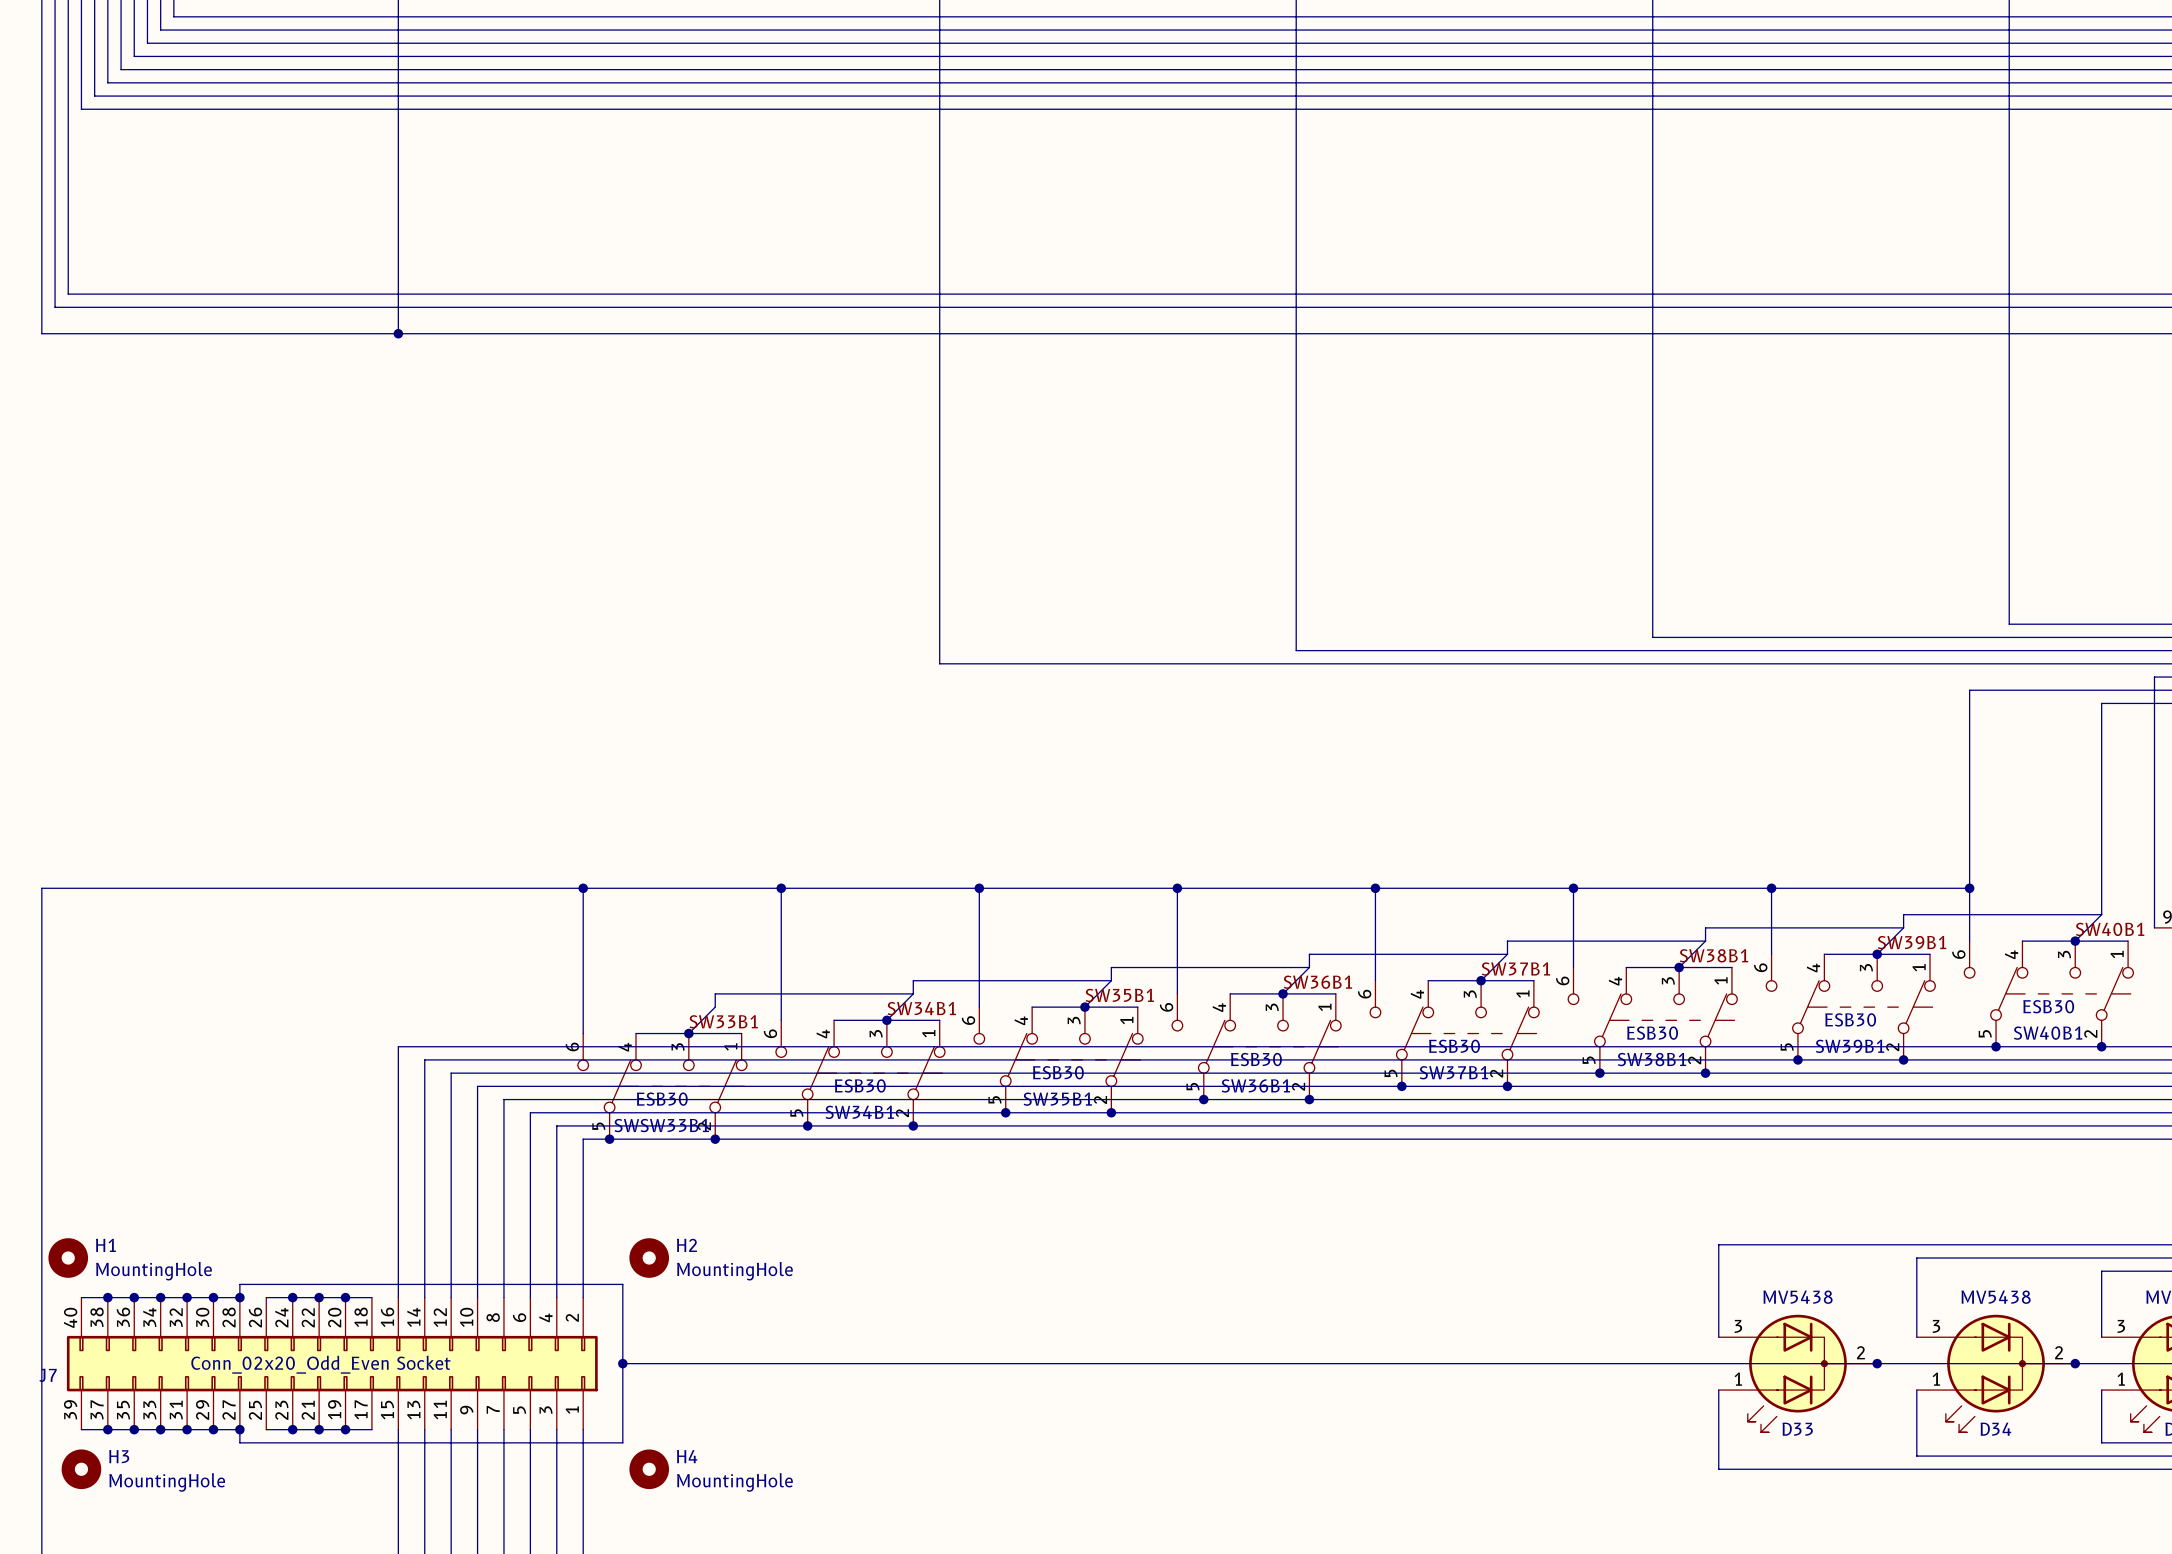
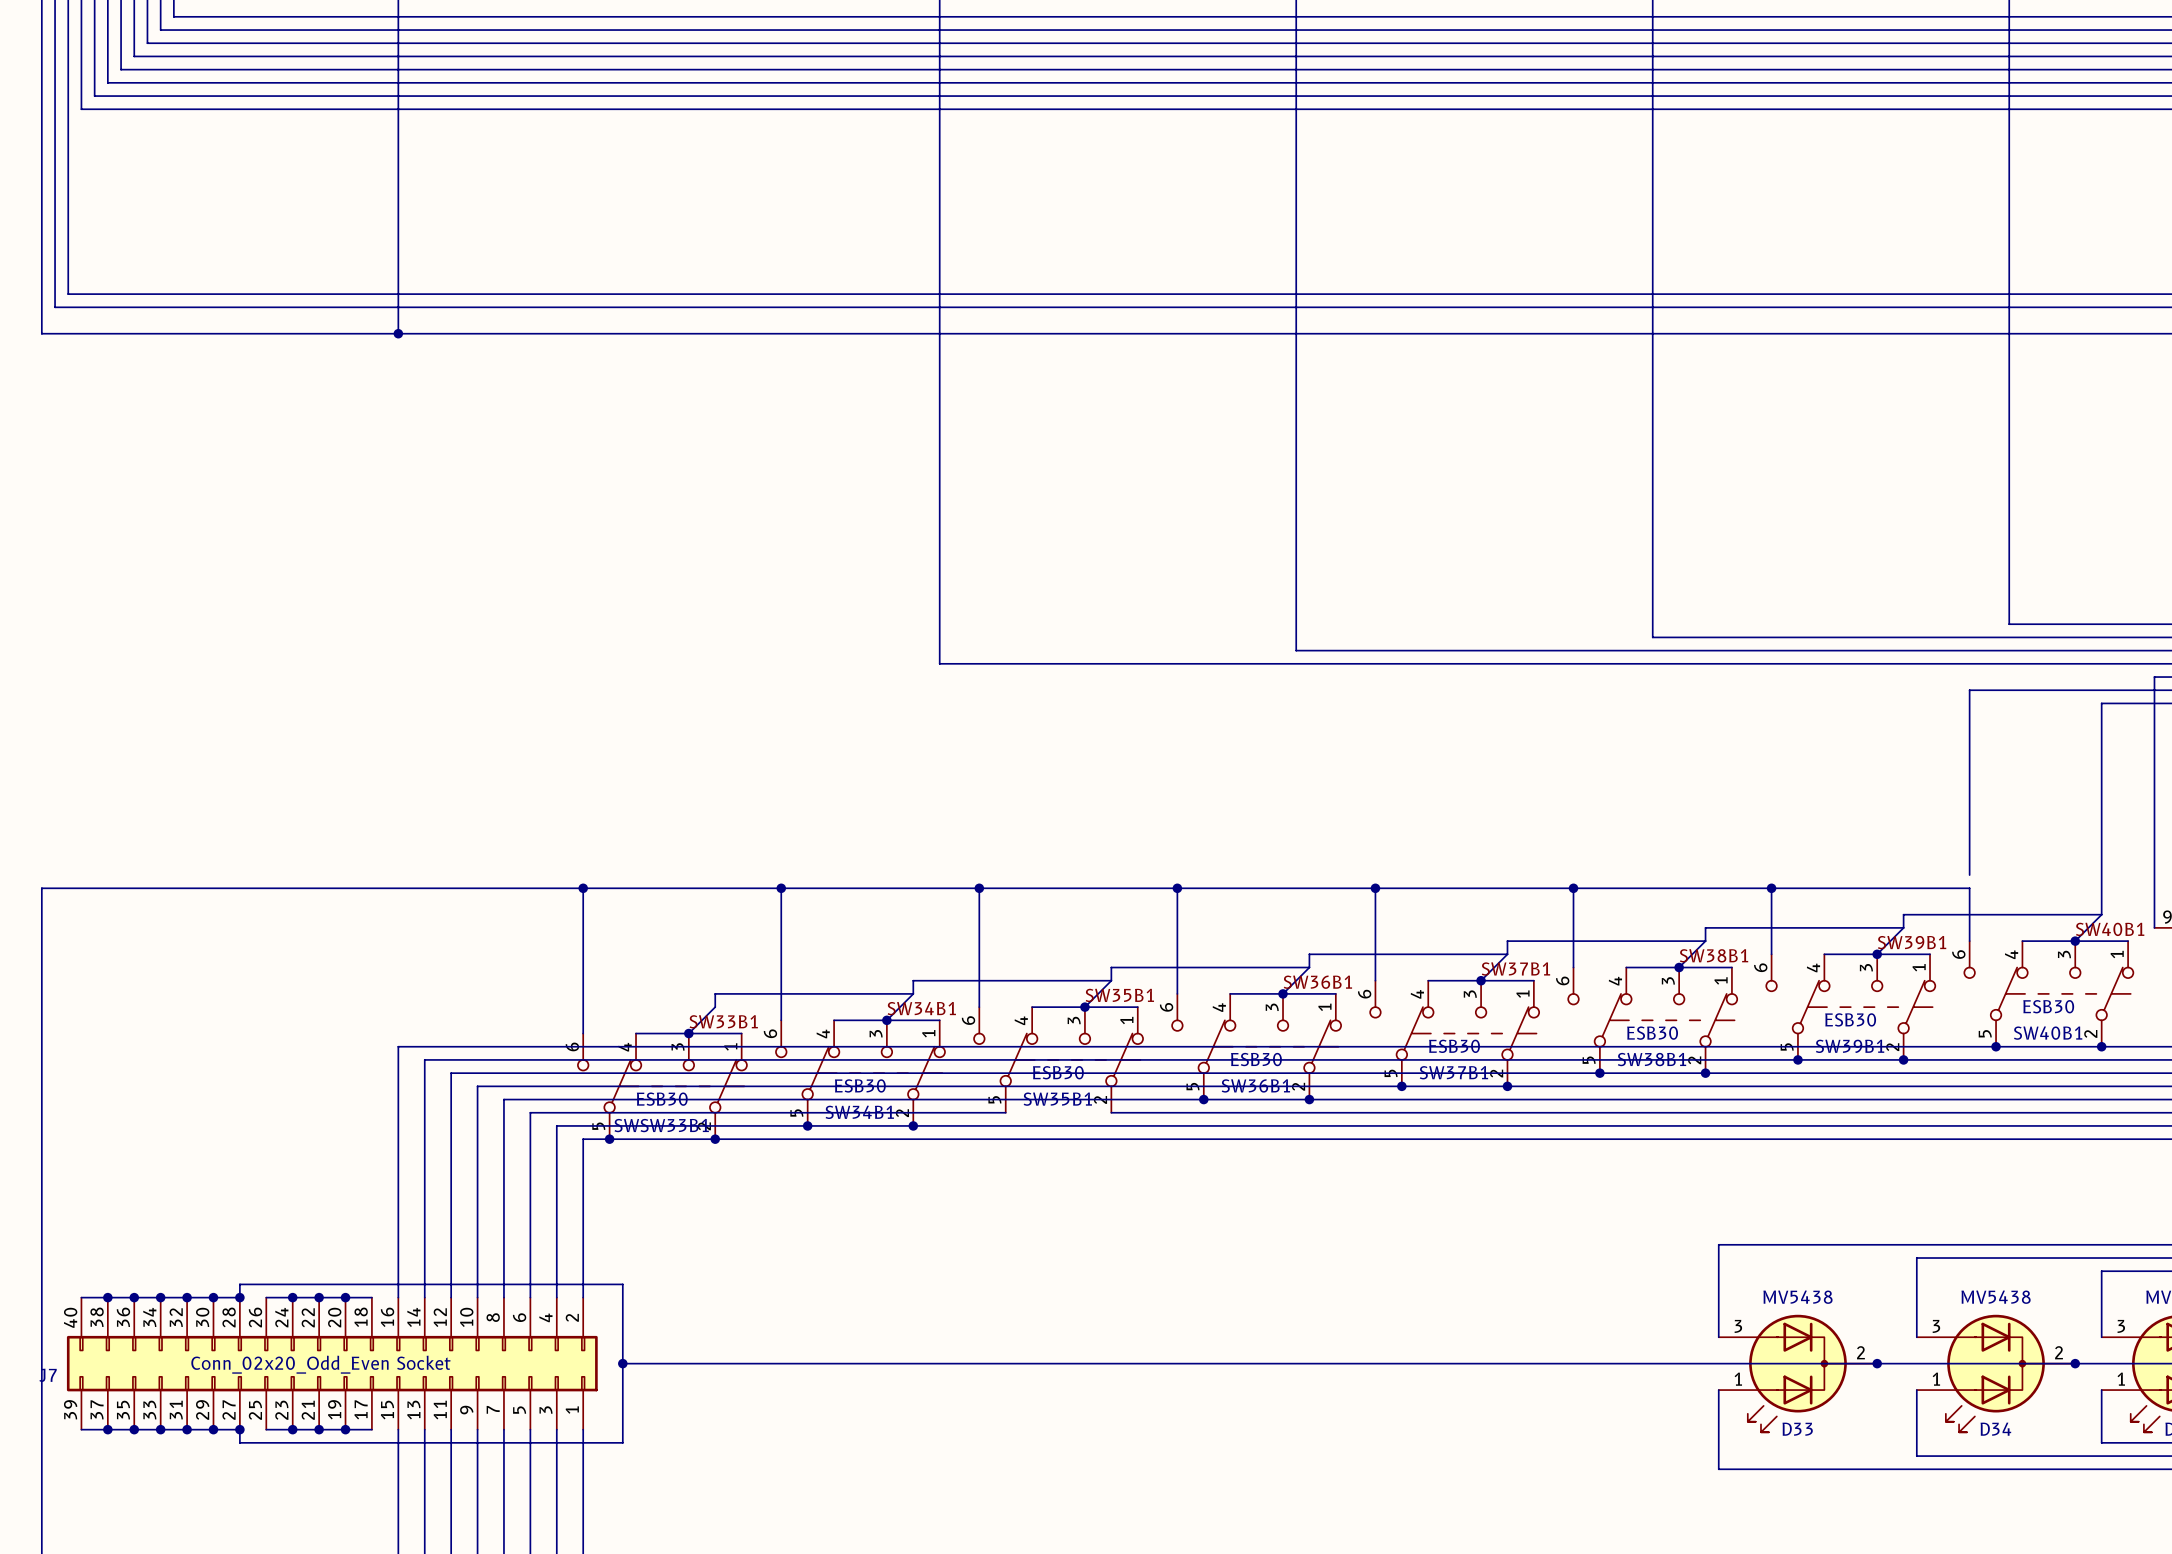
wire: (1969, 875) (1969, 888) -> none
junction: (1969, 888) -> none
wire: (1005, 1112) (1111, 1112) -> none
junction: (1005, 1112) -> none
junction: (1111, 1112) -> none
H1: MountingHole (68, 1258) -> none
H2: MountingHole (649, 1258) -> none
H3: MountingHole (81, 1469) -> none
H4: MountingHole (649, 1469) -> none

